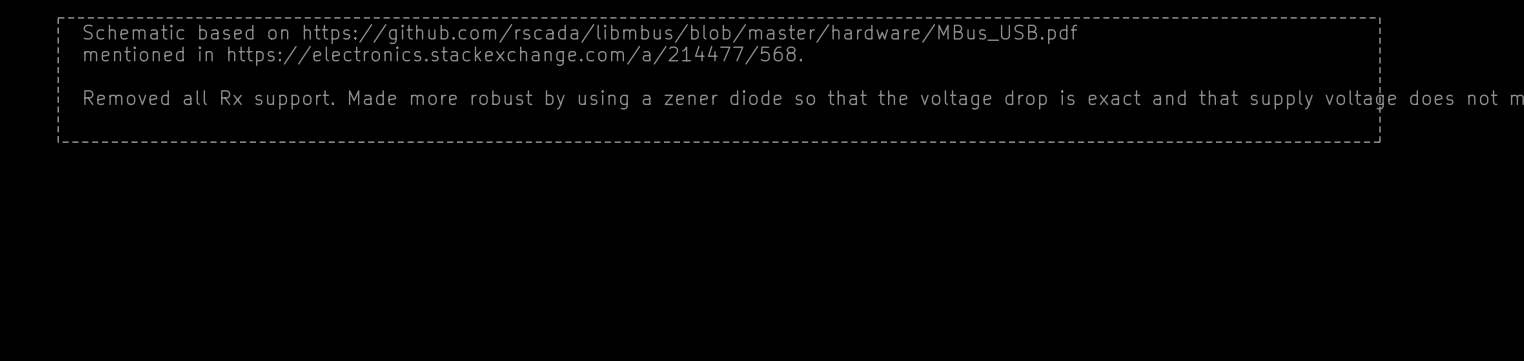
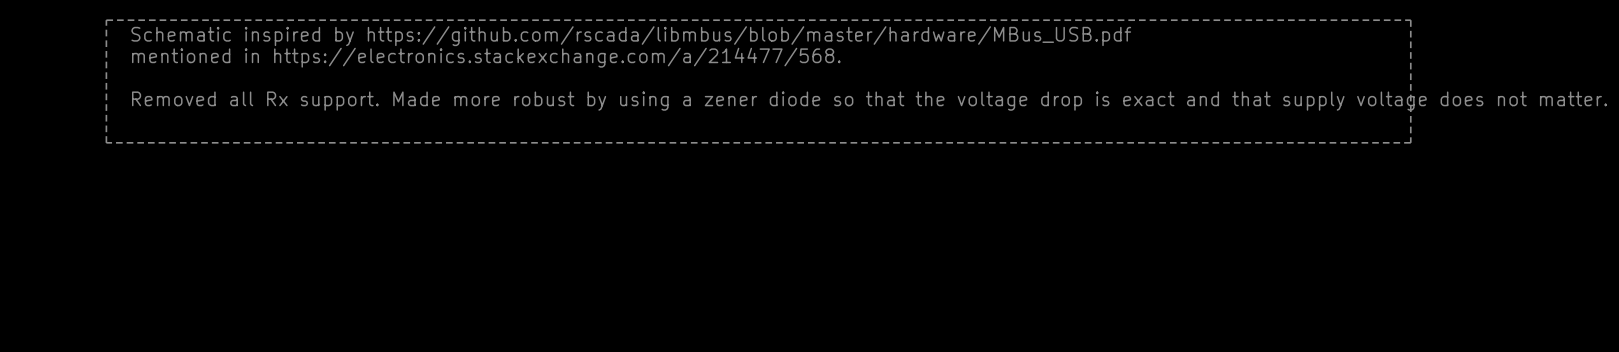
text: Schematic based on https://github.com/rscada/libmbus/blob/master/hardware/MBus_USB.pdf (580, 34) -> Schematic inspired by https://github.com/rscada/libmbus/blob/master/hardware/MBus_USB.pdf (631, 36)

